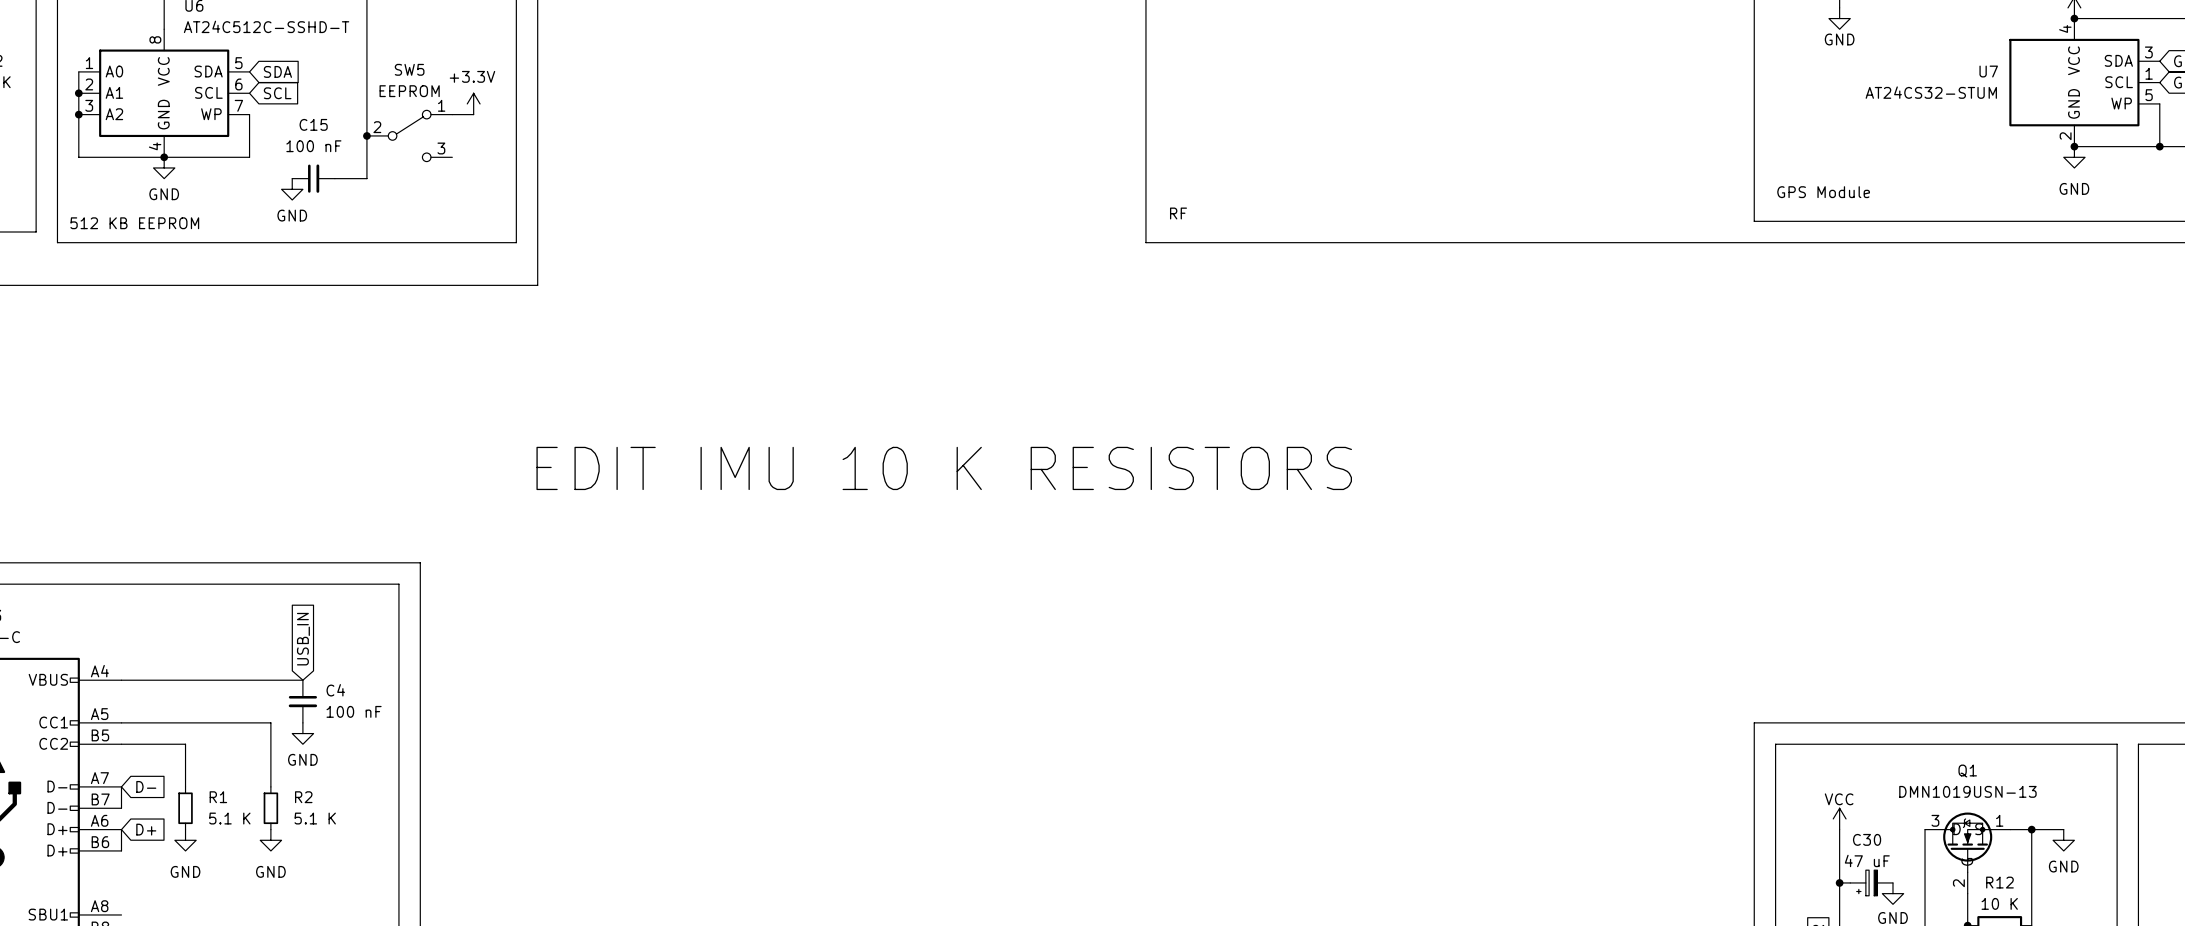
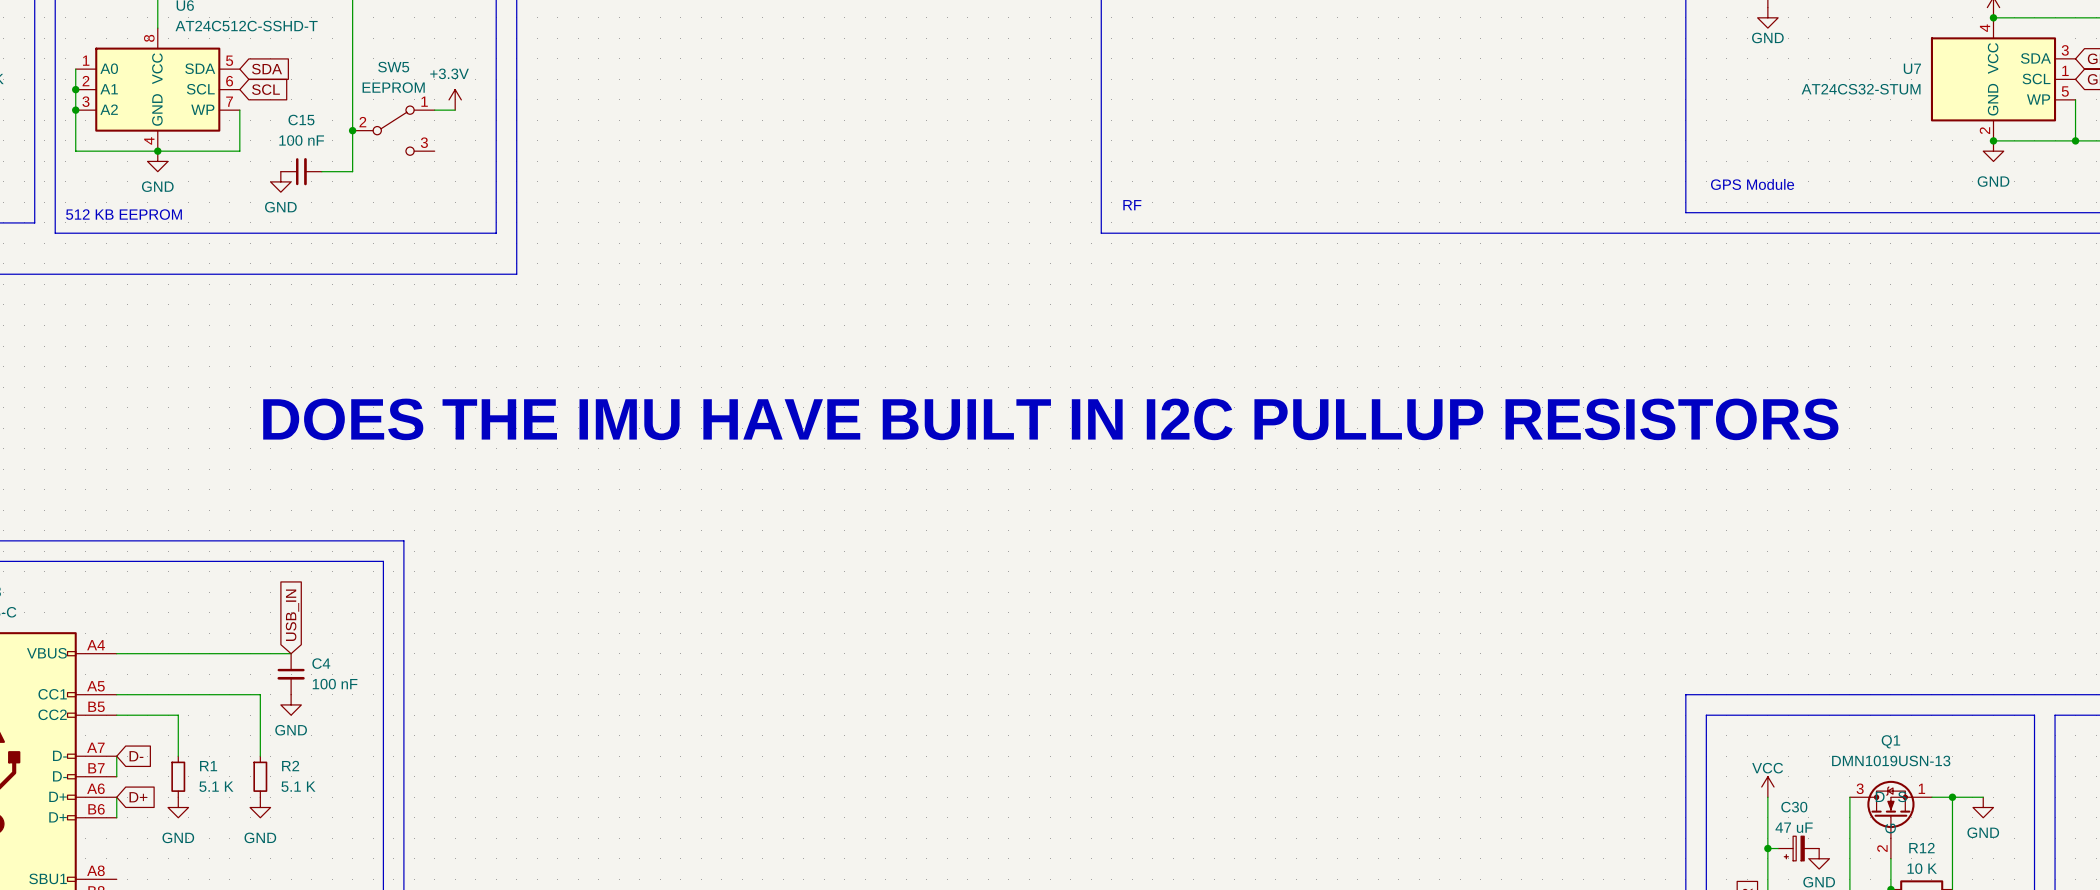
text: none -> DOES THE IMU HAVE BUILT IN I2C PULLUP RESISTORS (1050, 419)
text: EDIT IMU 10 K RESISTORS (944, 468) -> none

